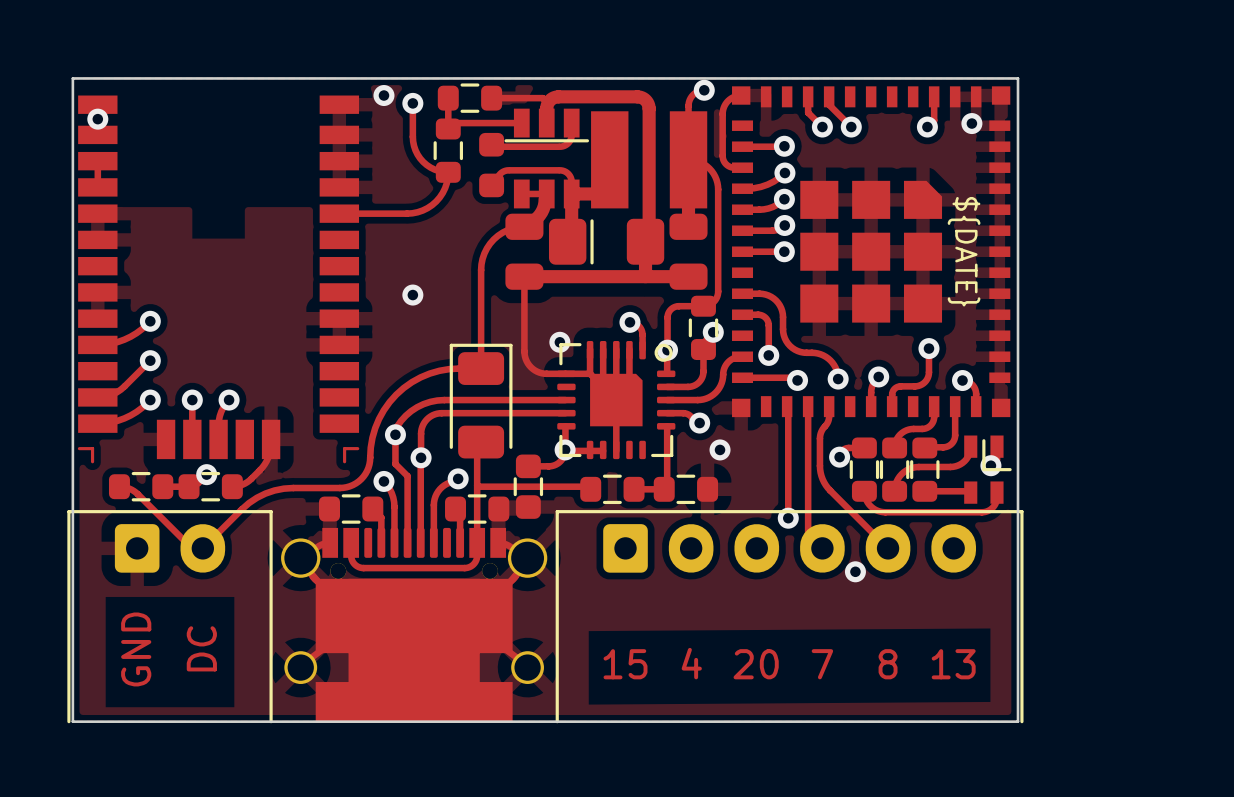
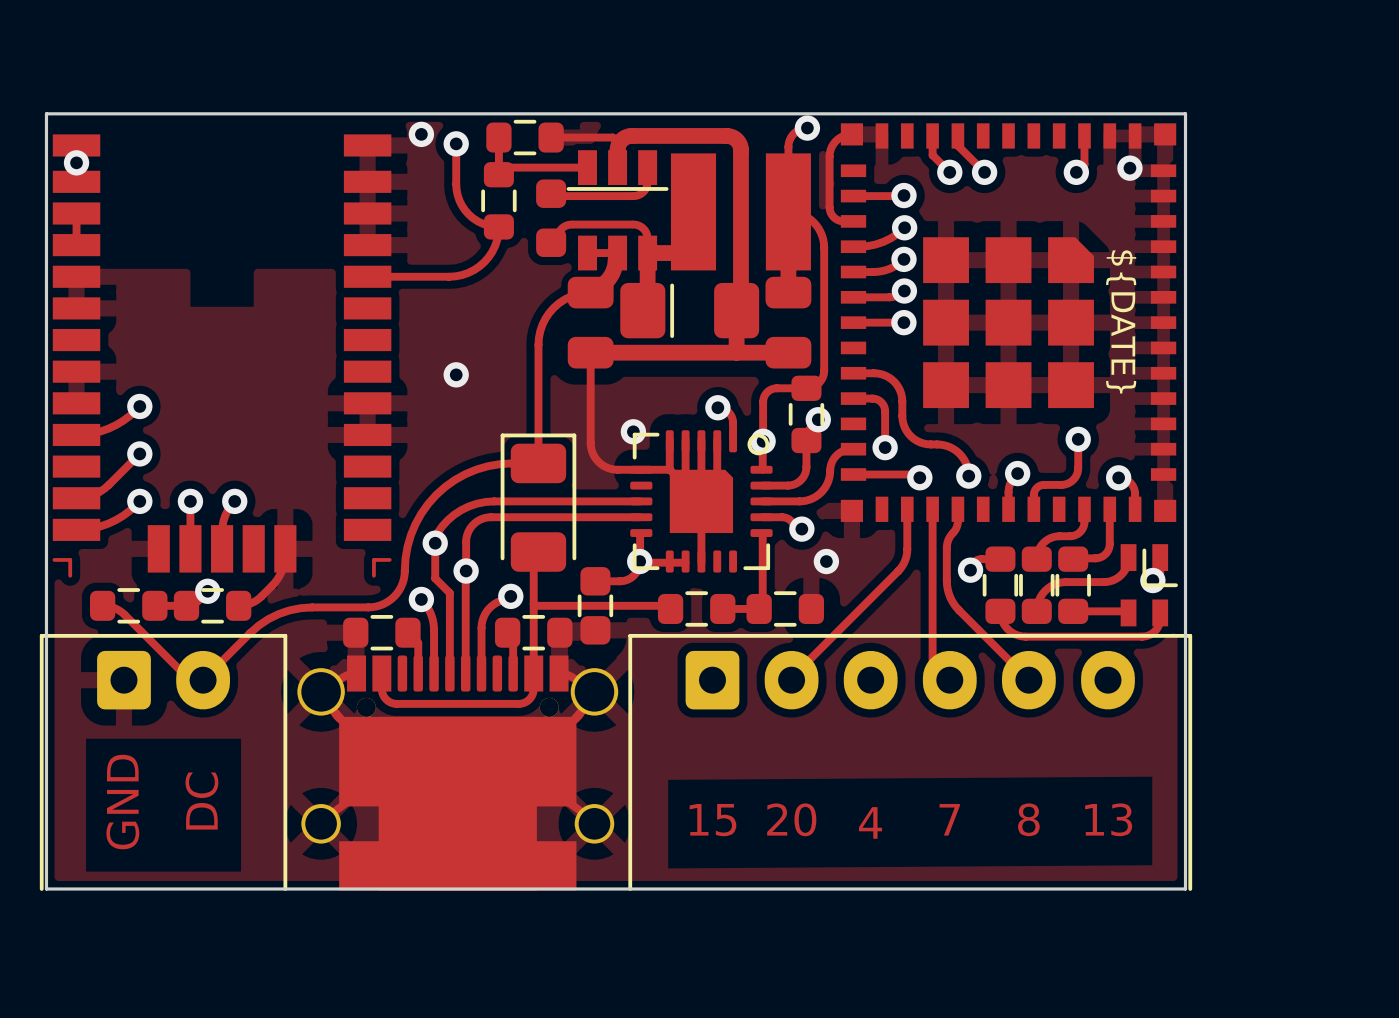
track: (787, 406) (788, 518) -> (907, 509) (907, 552) (902, 566) (791, 677) (791, 680)
via: (788, 518) -> none
via: (855, 571) -> none
text: 4 (691, 663) -> 20 (791, 819)
text: 20 (756, 664) -> 4 (870, 822)

